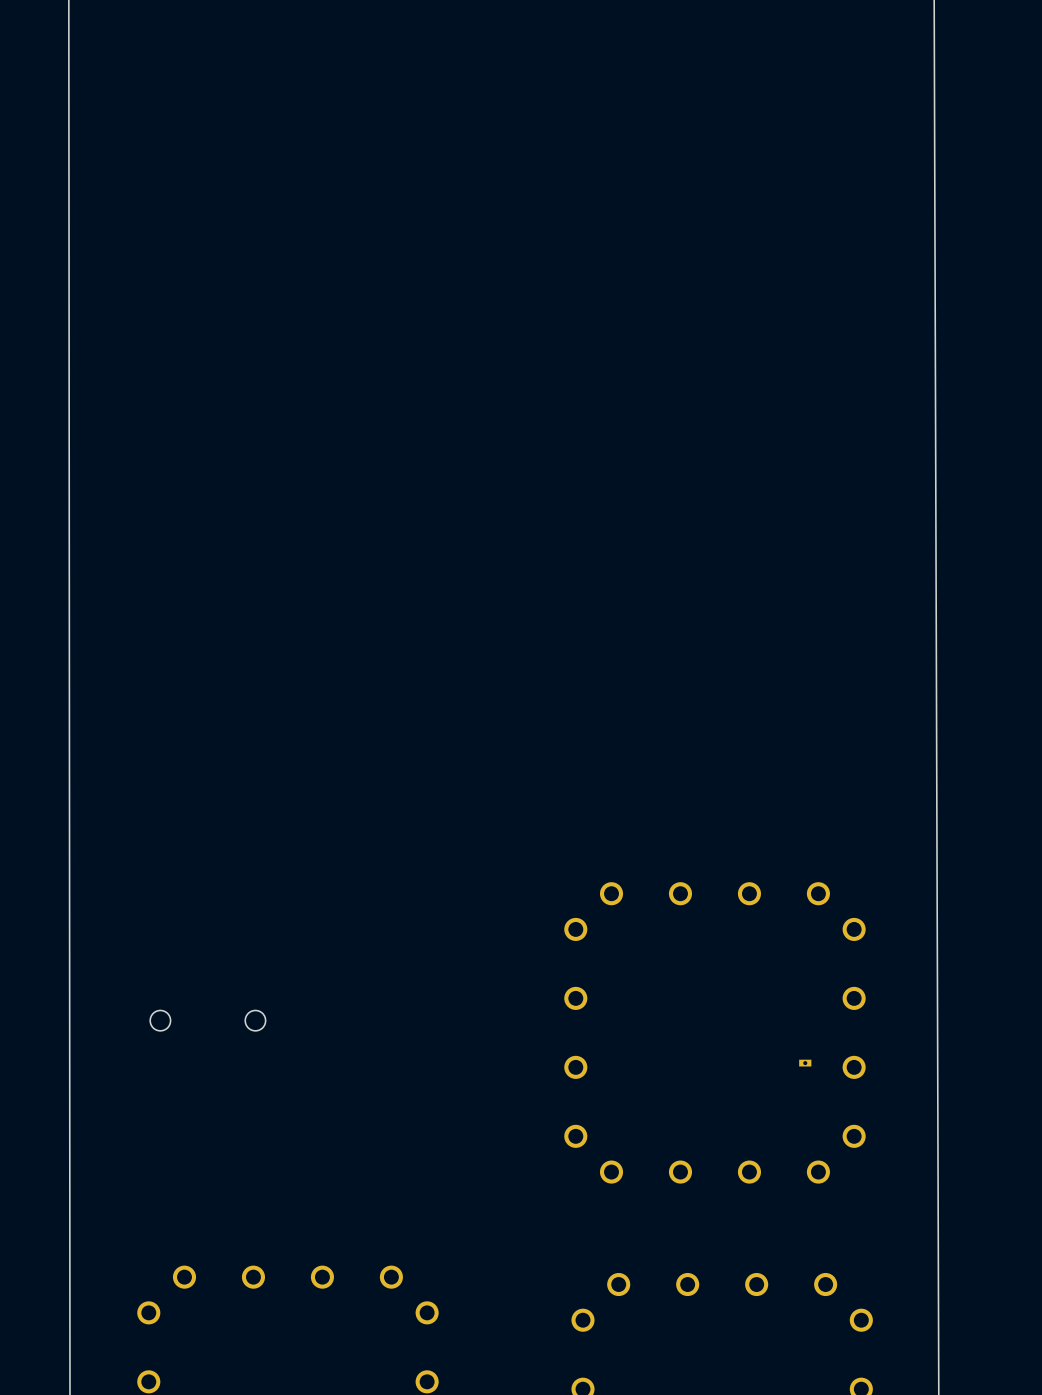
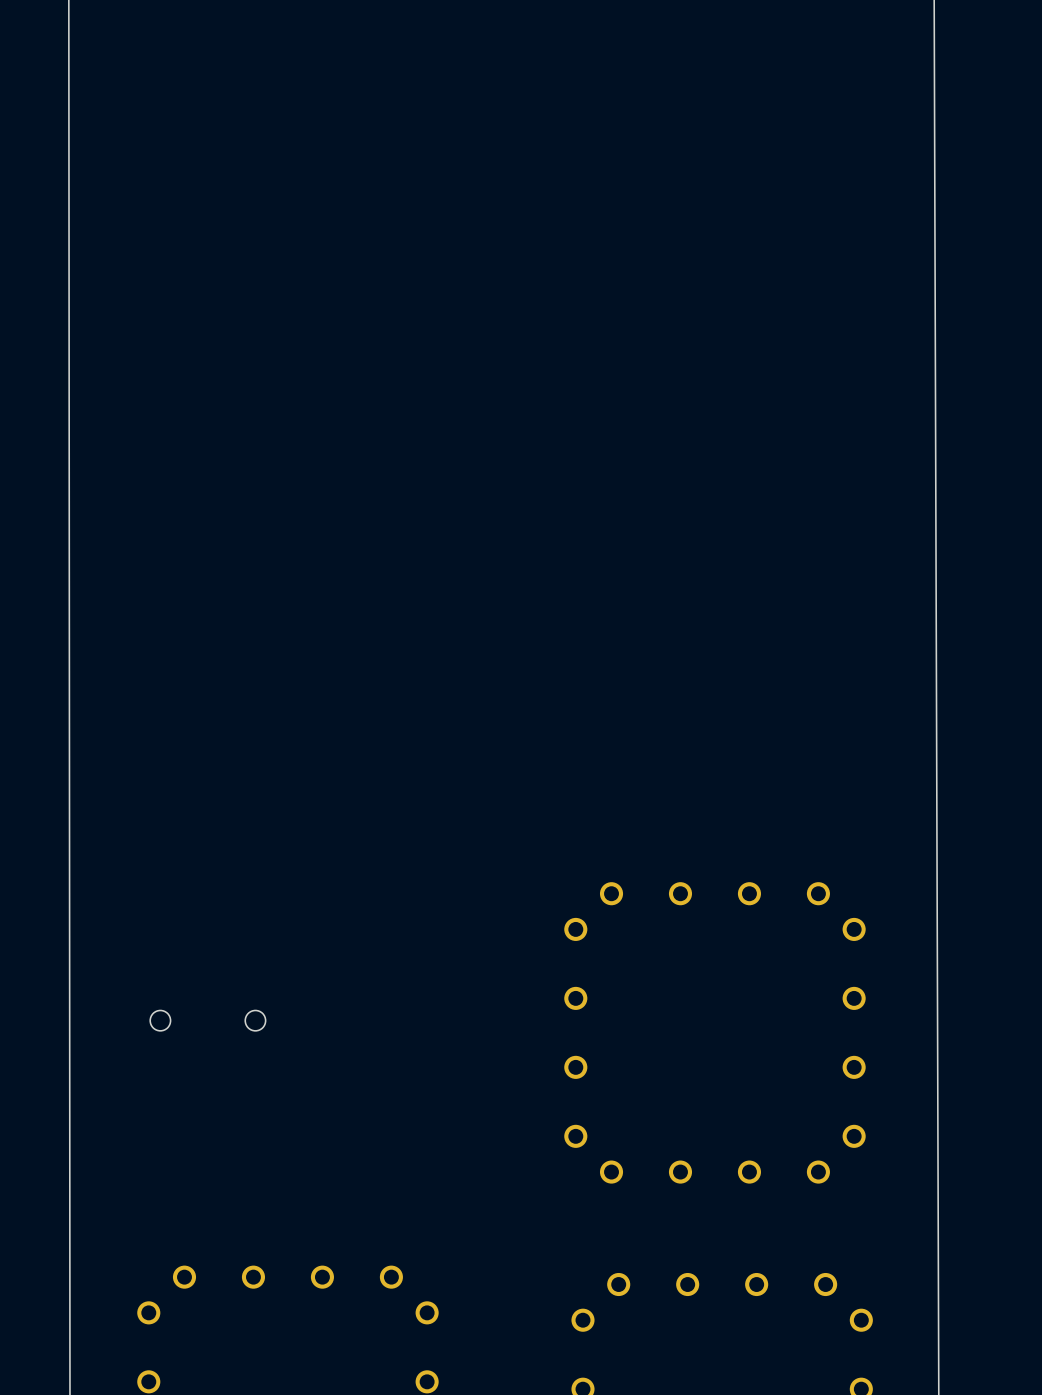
part: (805, 1063) -> none

